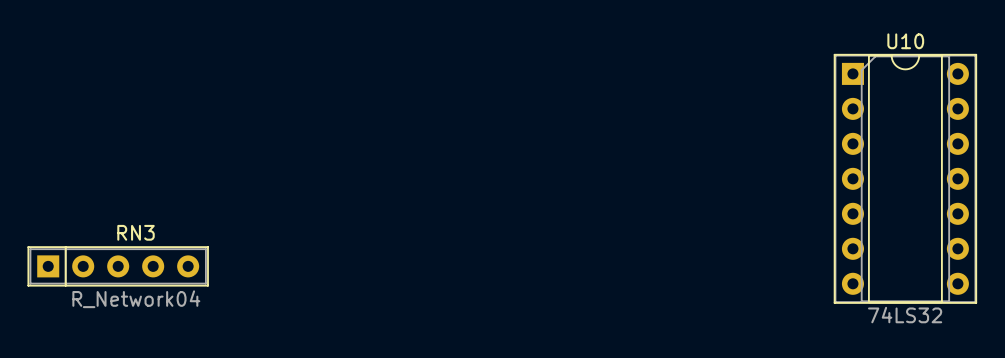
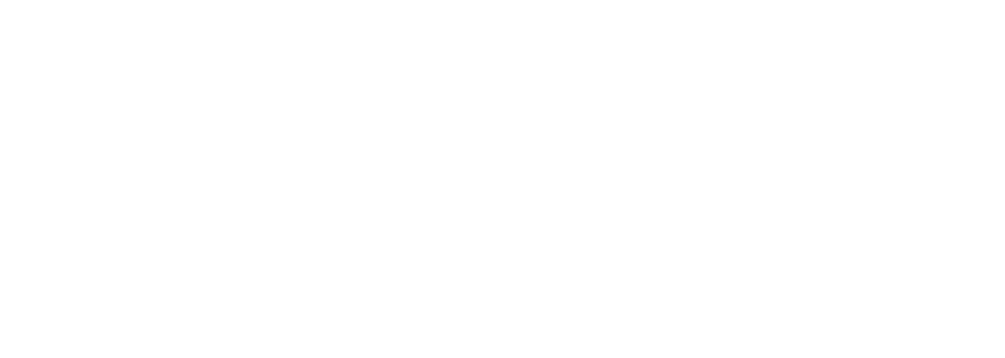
U10: 74LS32 (905, 178) -> none
RN3: R_Network04 (118, 266) -> none

